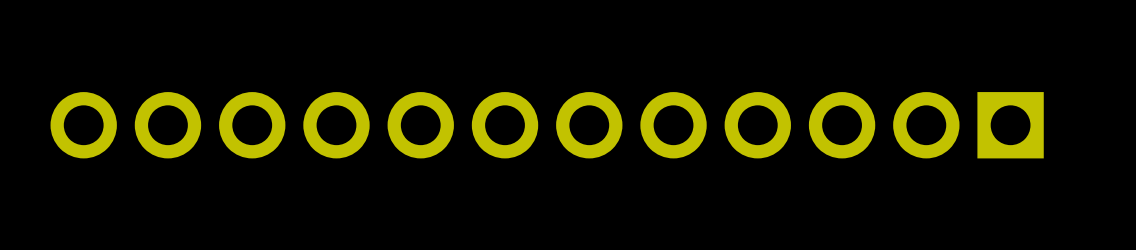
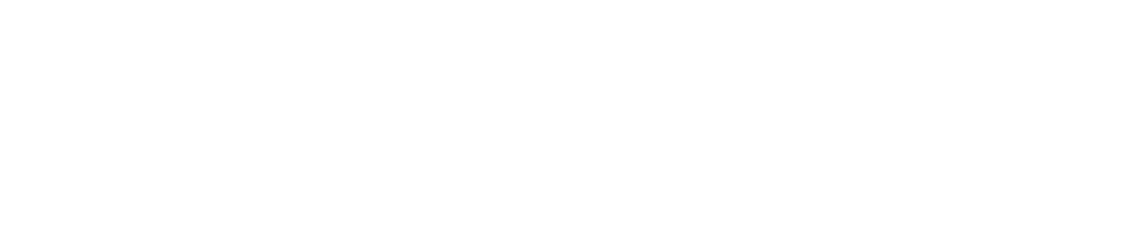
part: (547, 125) -> none

